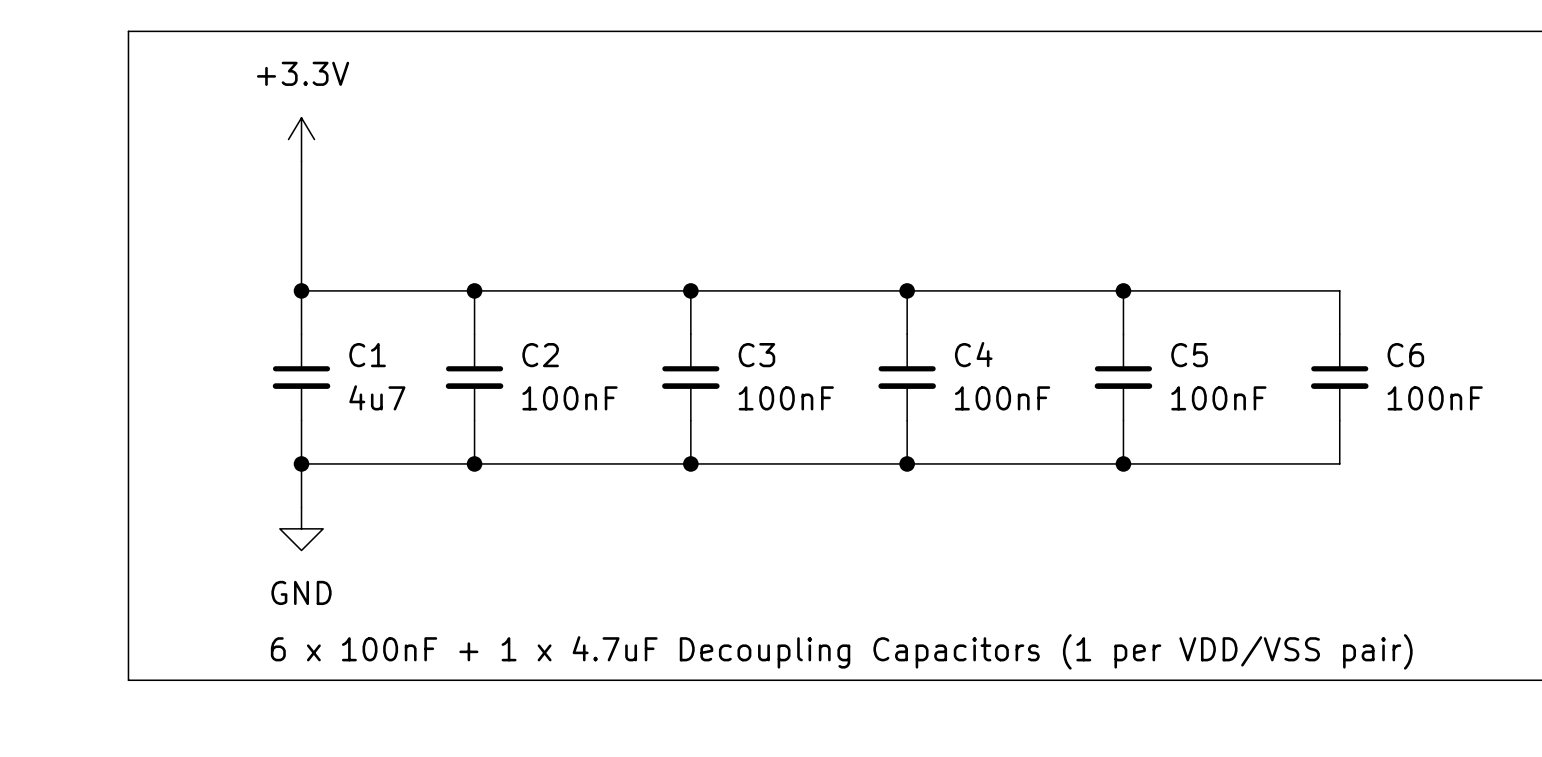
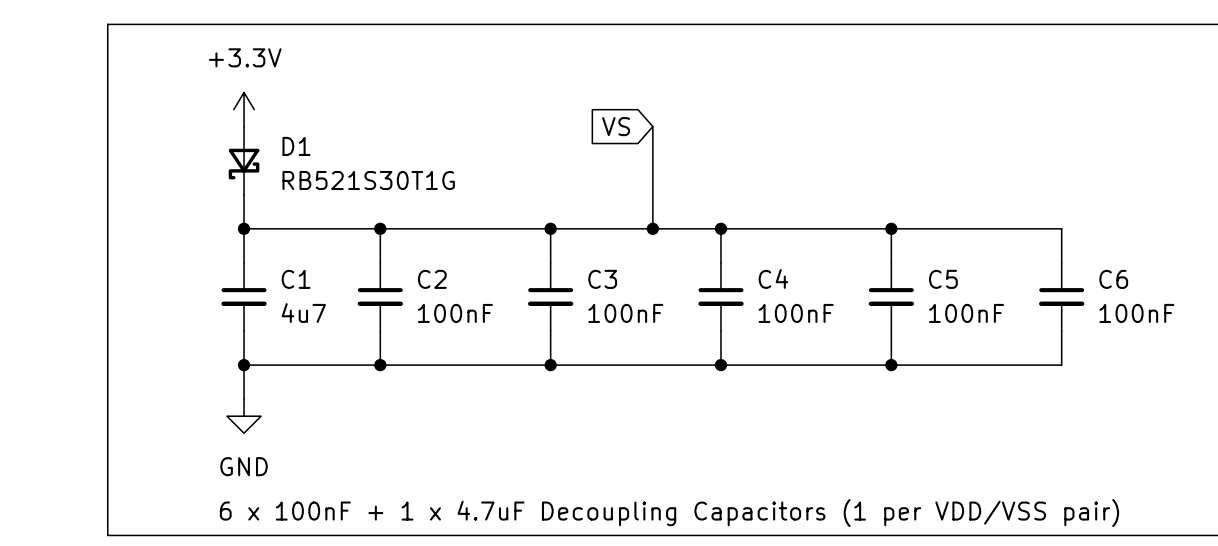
global label: none -> VS (616, 126)
wire: none -> (652, 126) (652, 228)
D1: none -> RB521S30T1G (244, 160)
junction: none -> (652, 228)

